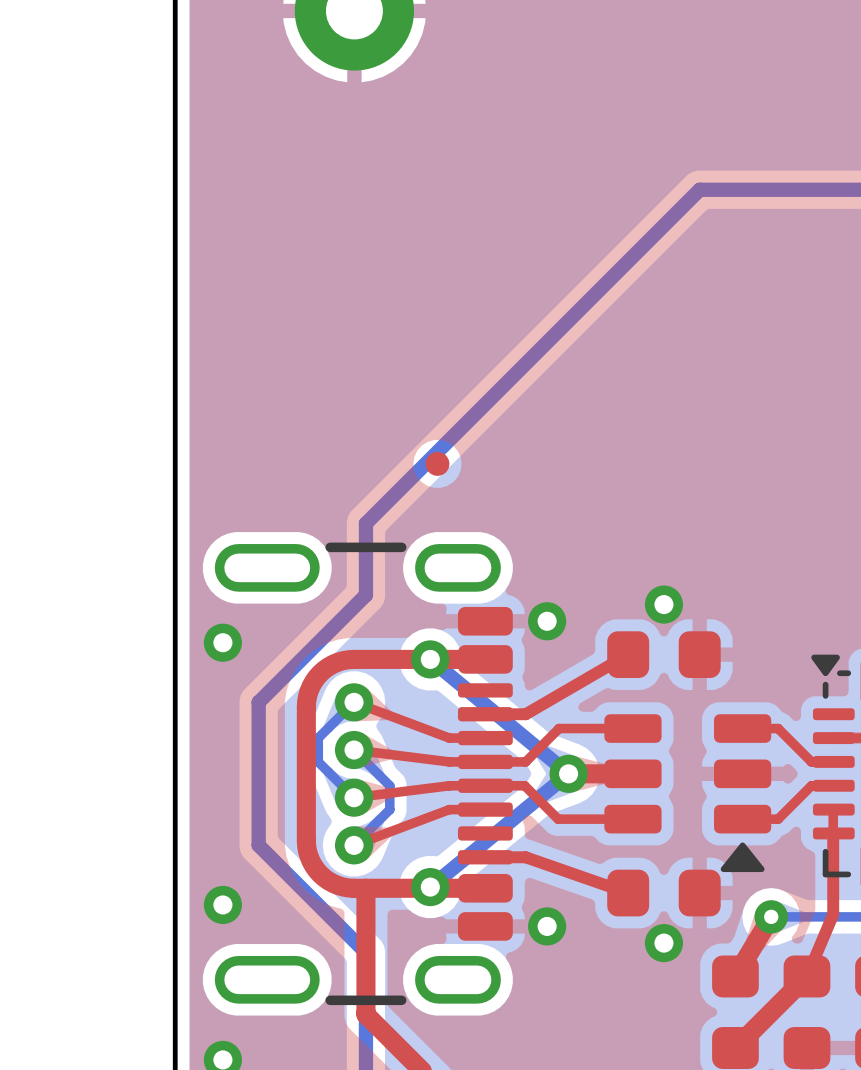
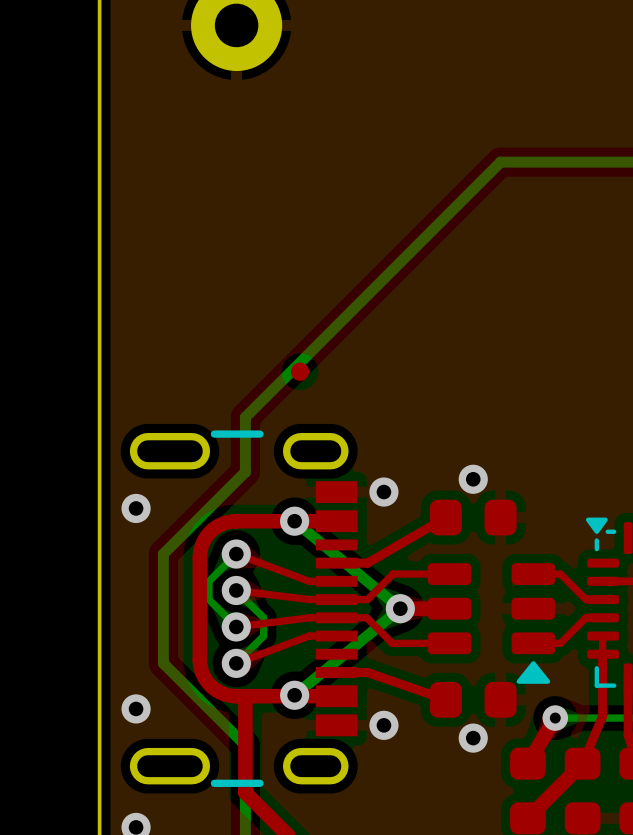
part footprint: [214, 542, 513, 1006] -> [129, 430, 358, 787]

